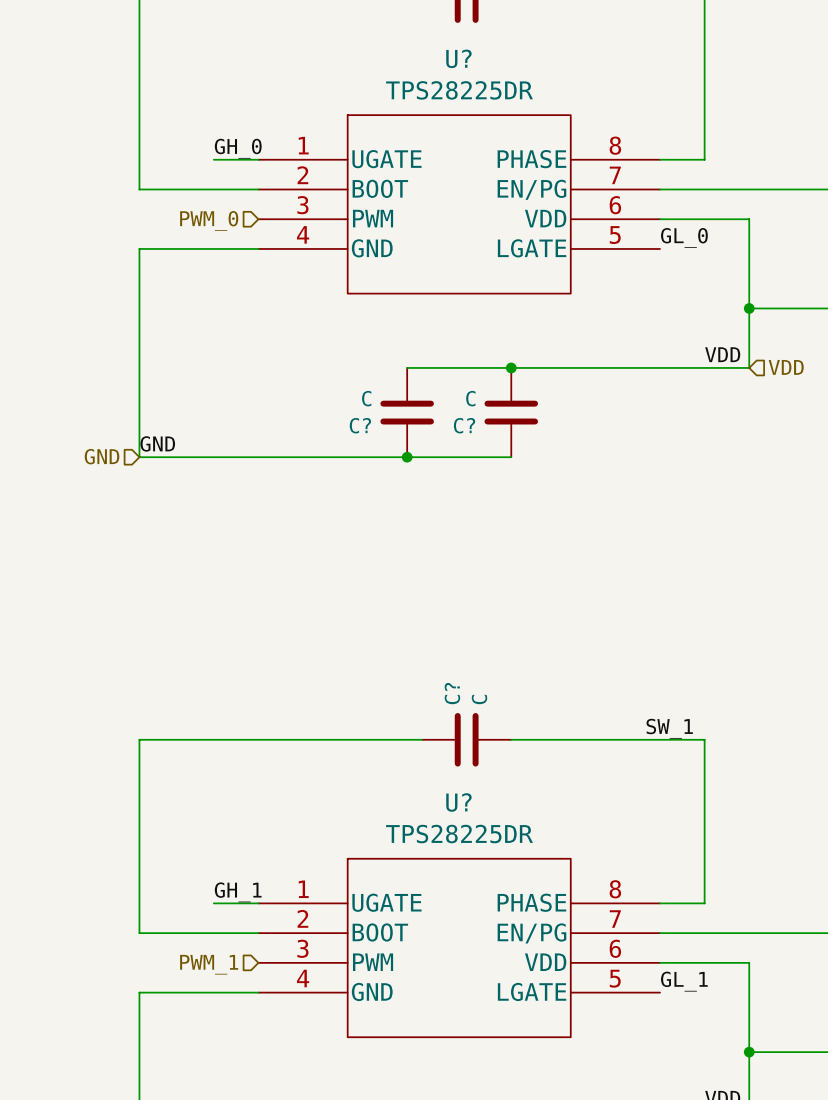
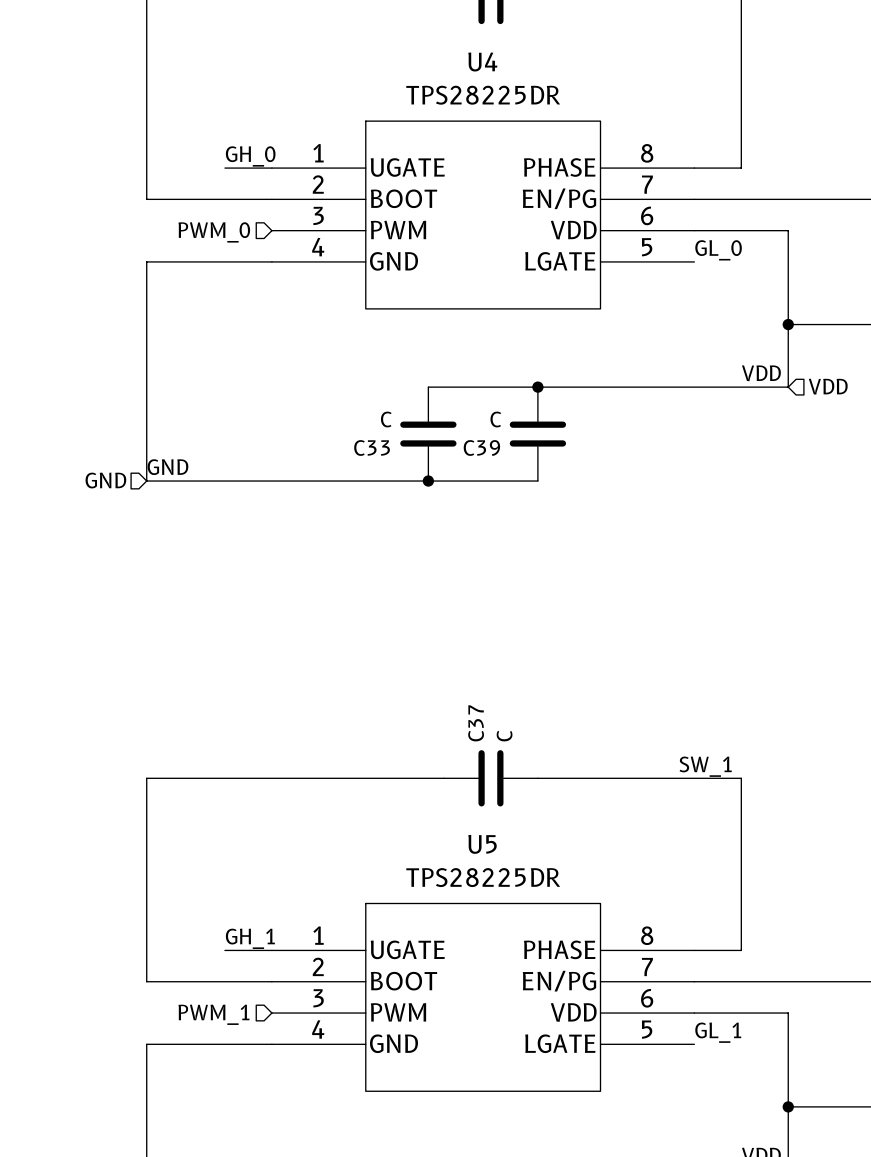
U? name: U? (458, 58) -> U4 (482, 62)
C? name: C? (360, 425) -> C33 (372, 447)
C? name: C? (464, 425) -> C39 (481, 447)
C? name: C? (452, 693) -> C37 (476, 723)
U? name: U? (458, 802) -> U5 (482, 844)

